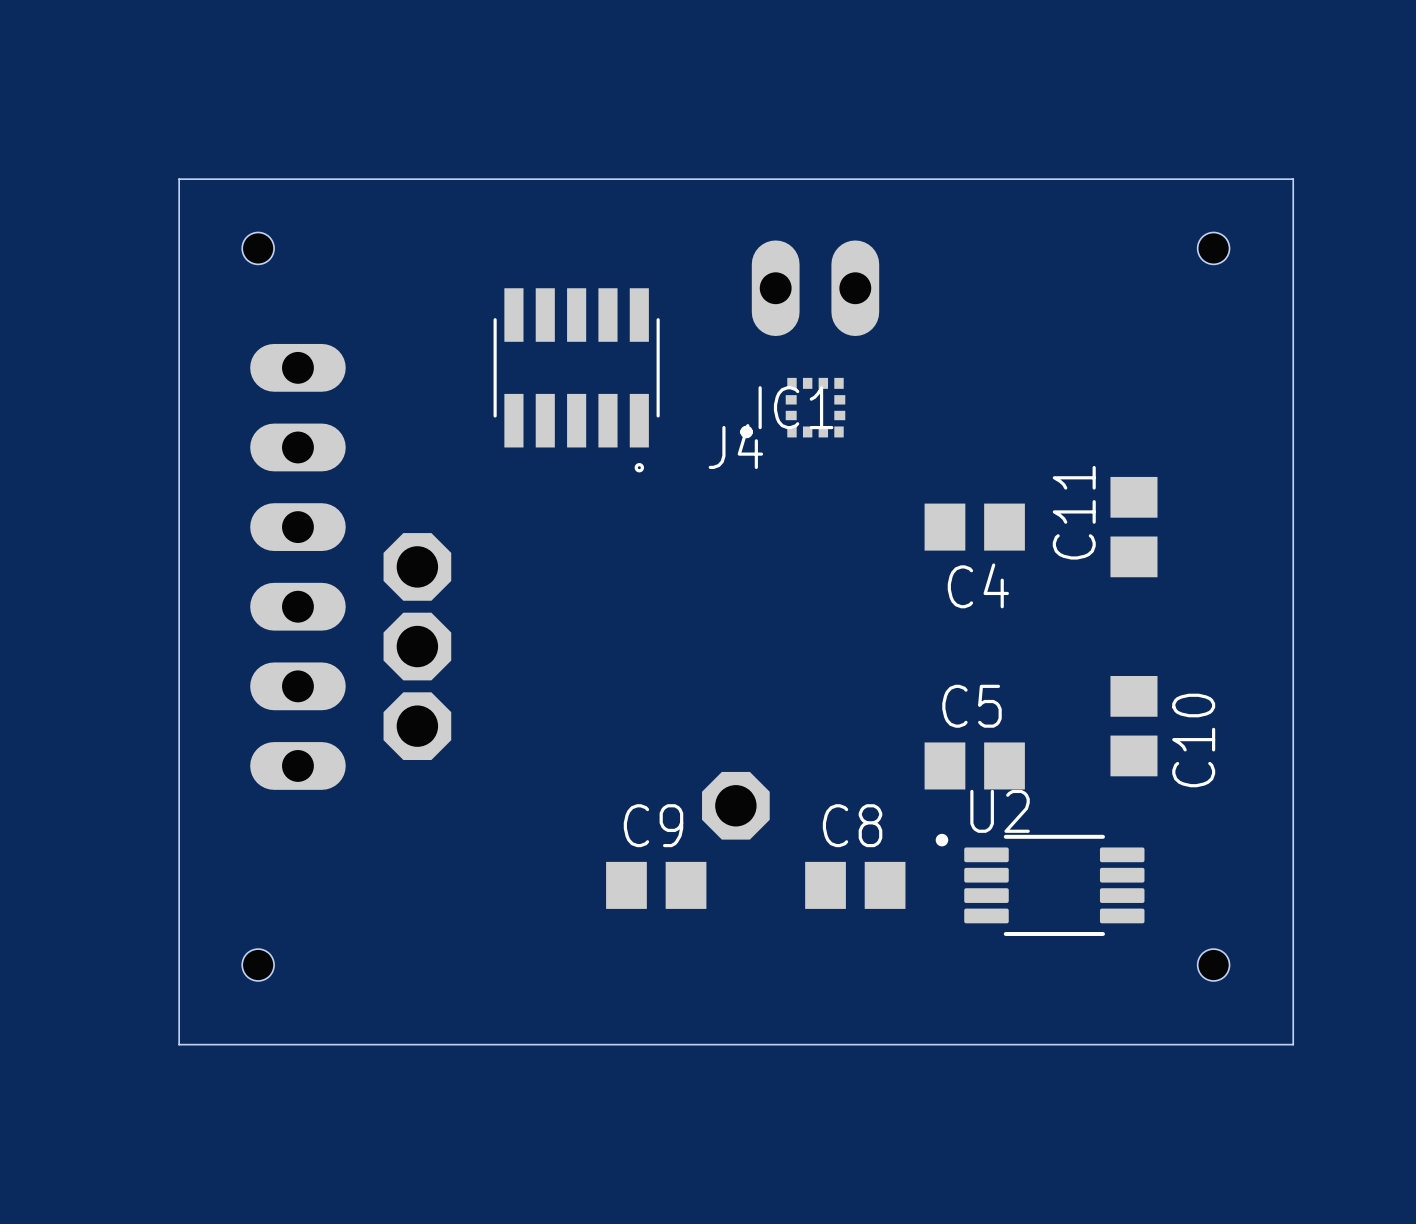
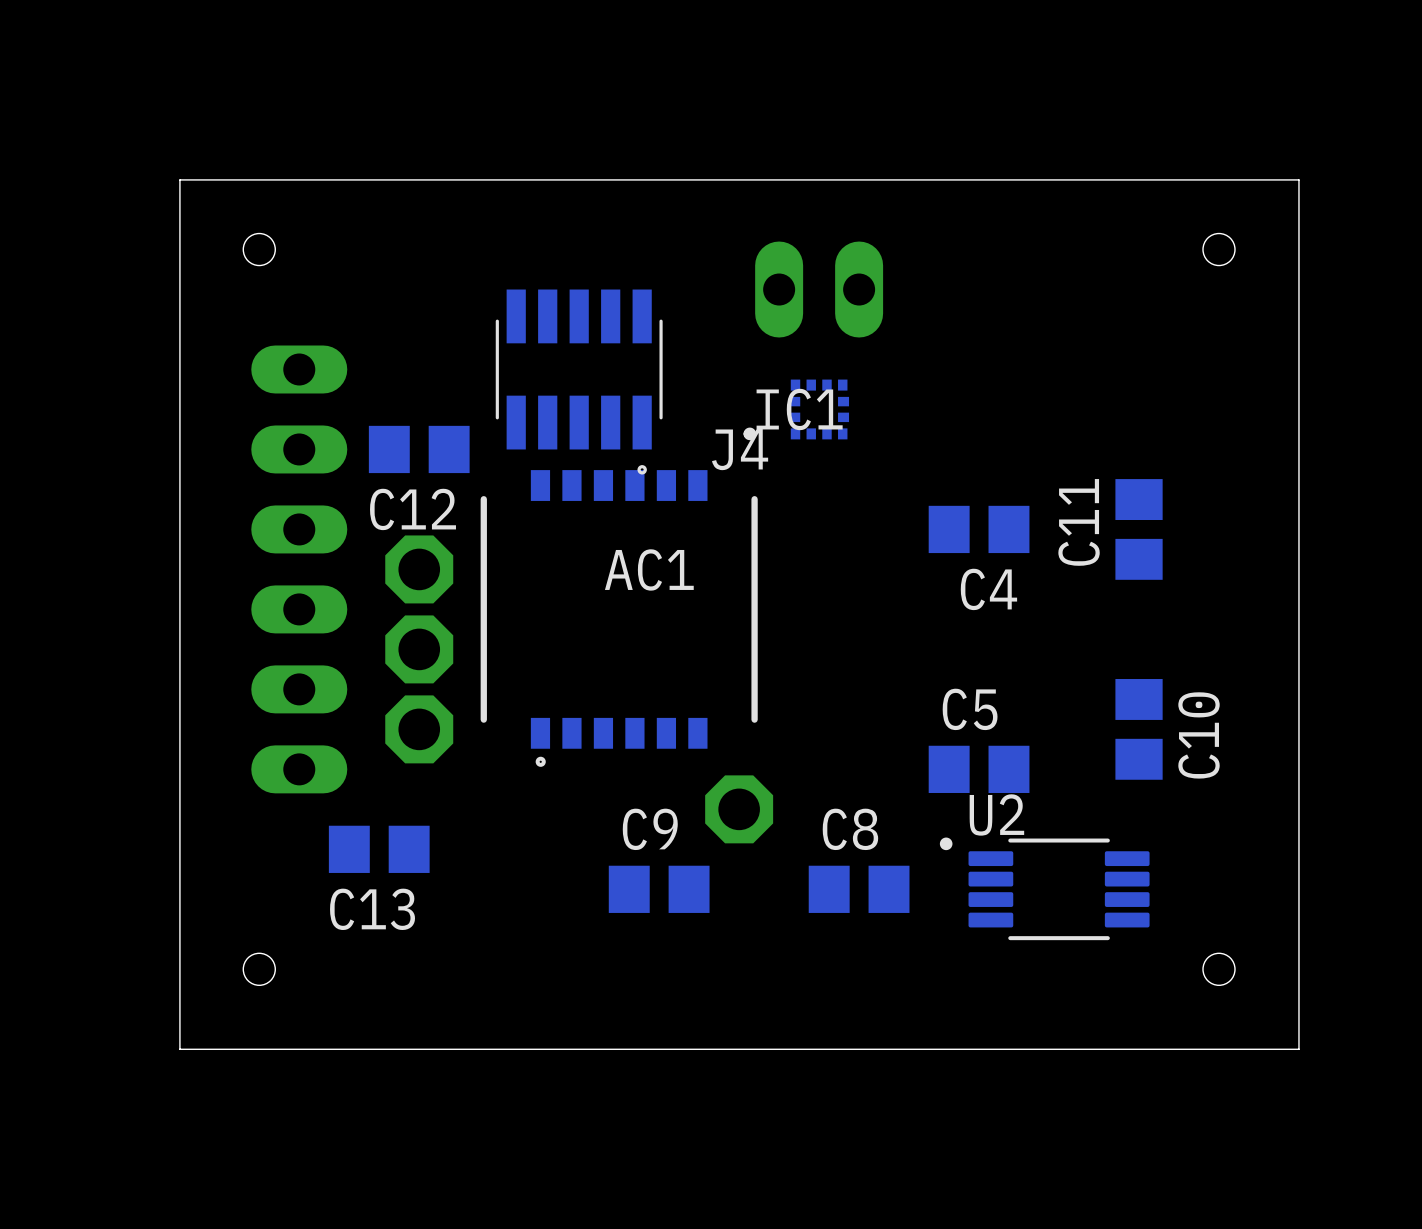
C12: none -> (419, 449)
AC1: none -> (619, 618)
C13: none -> (379, 849)

